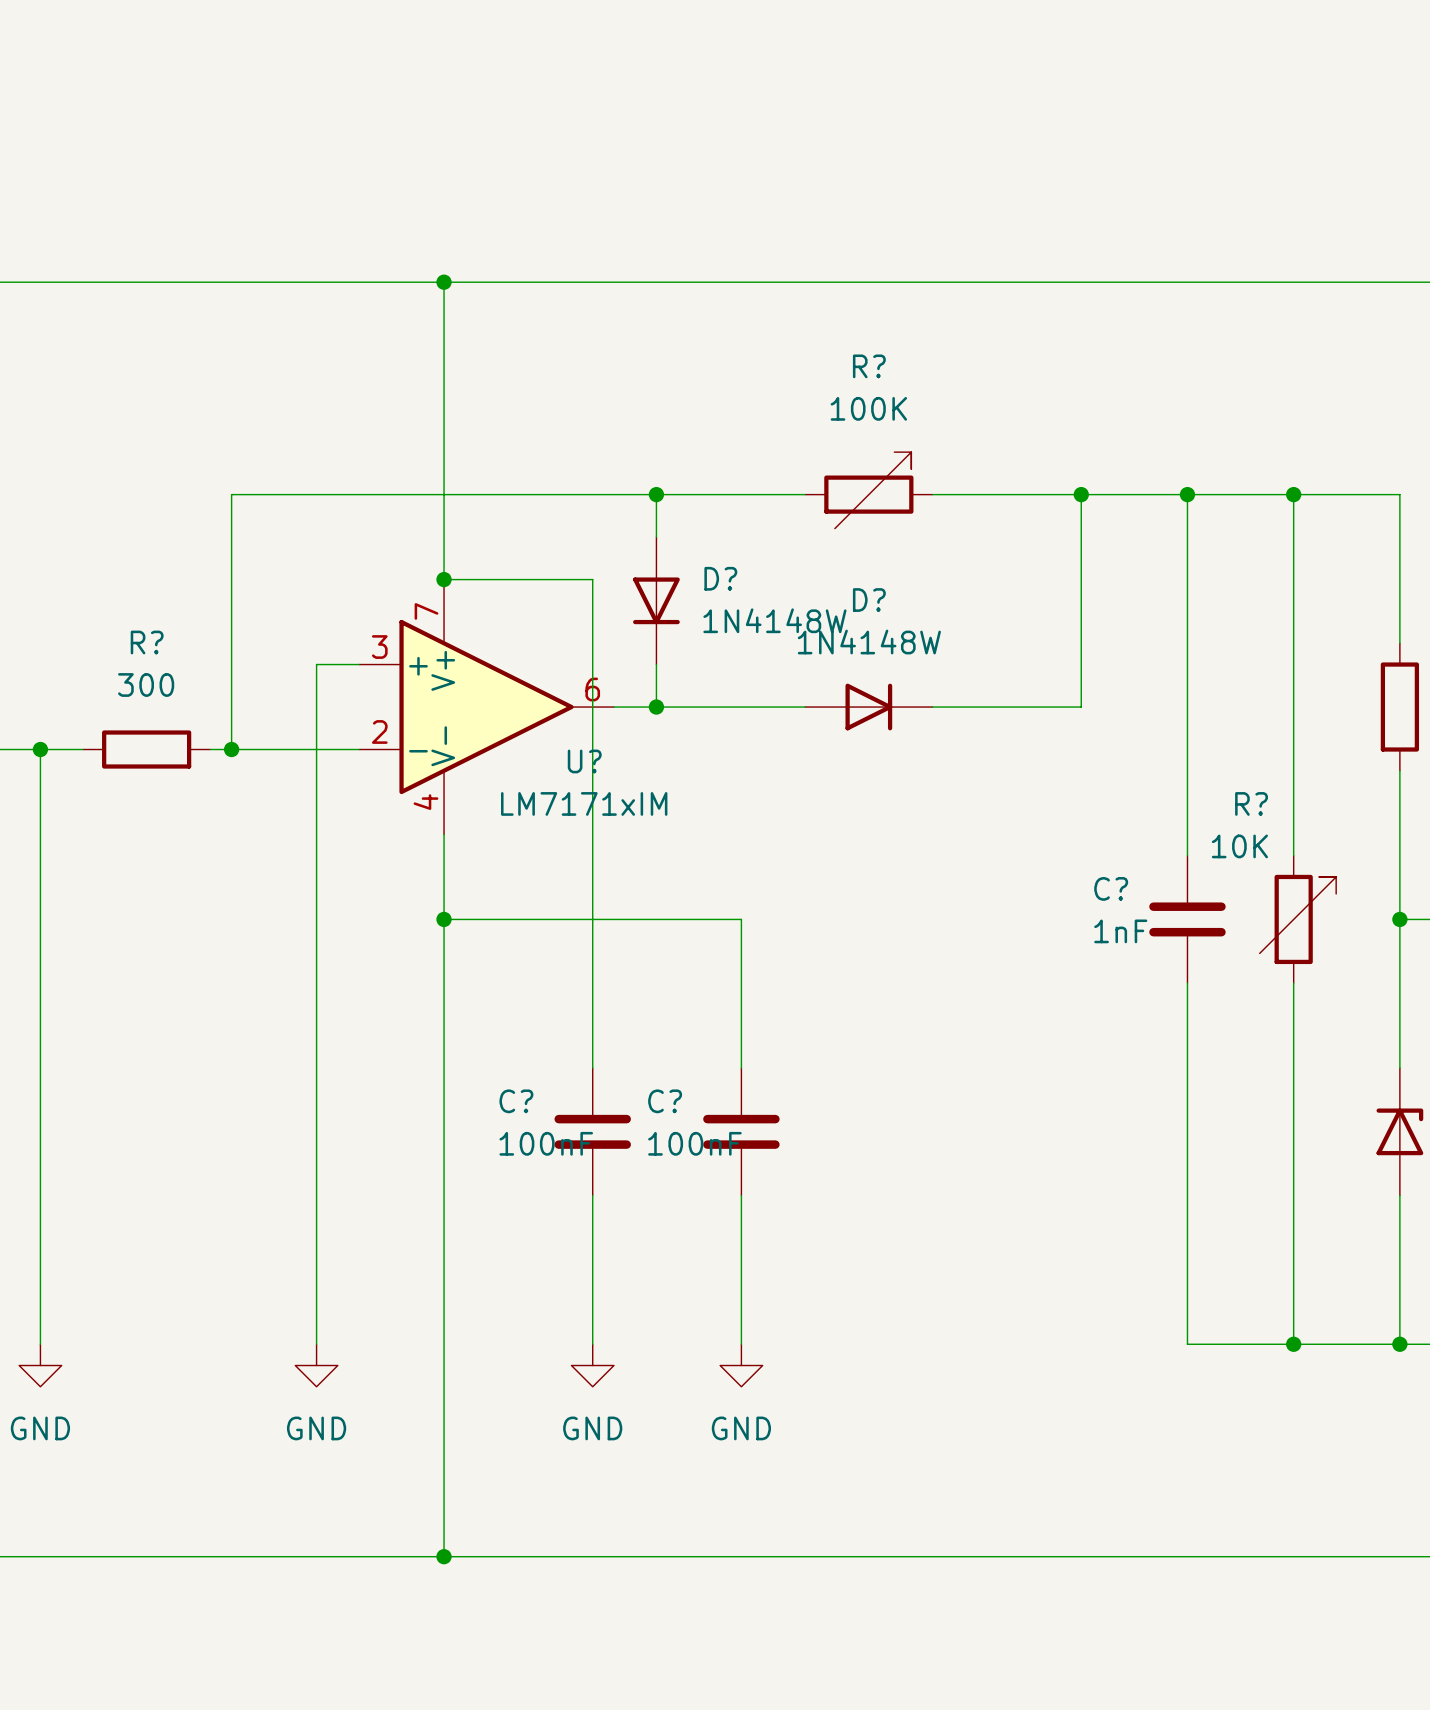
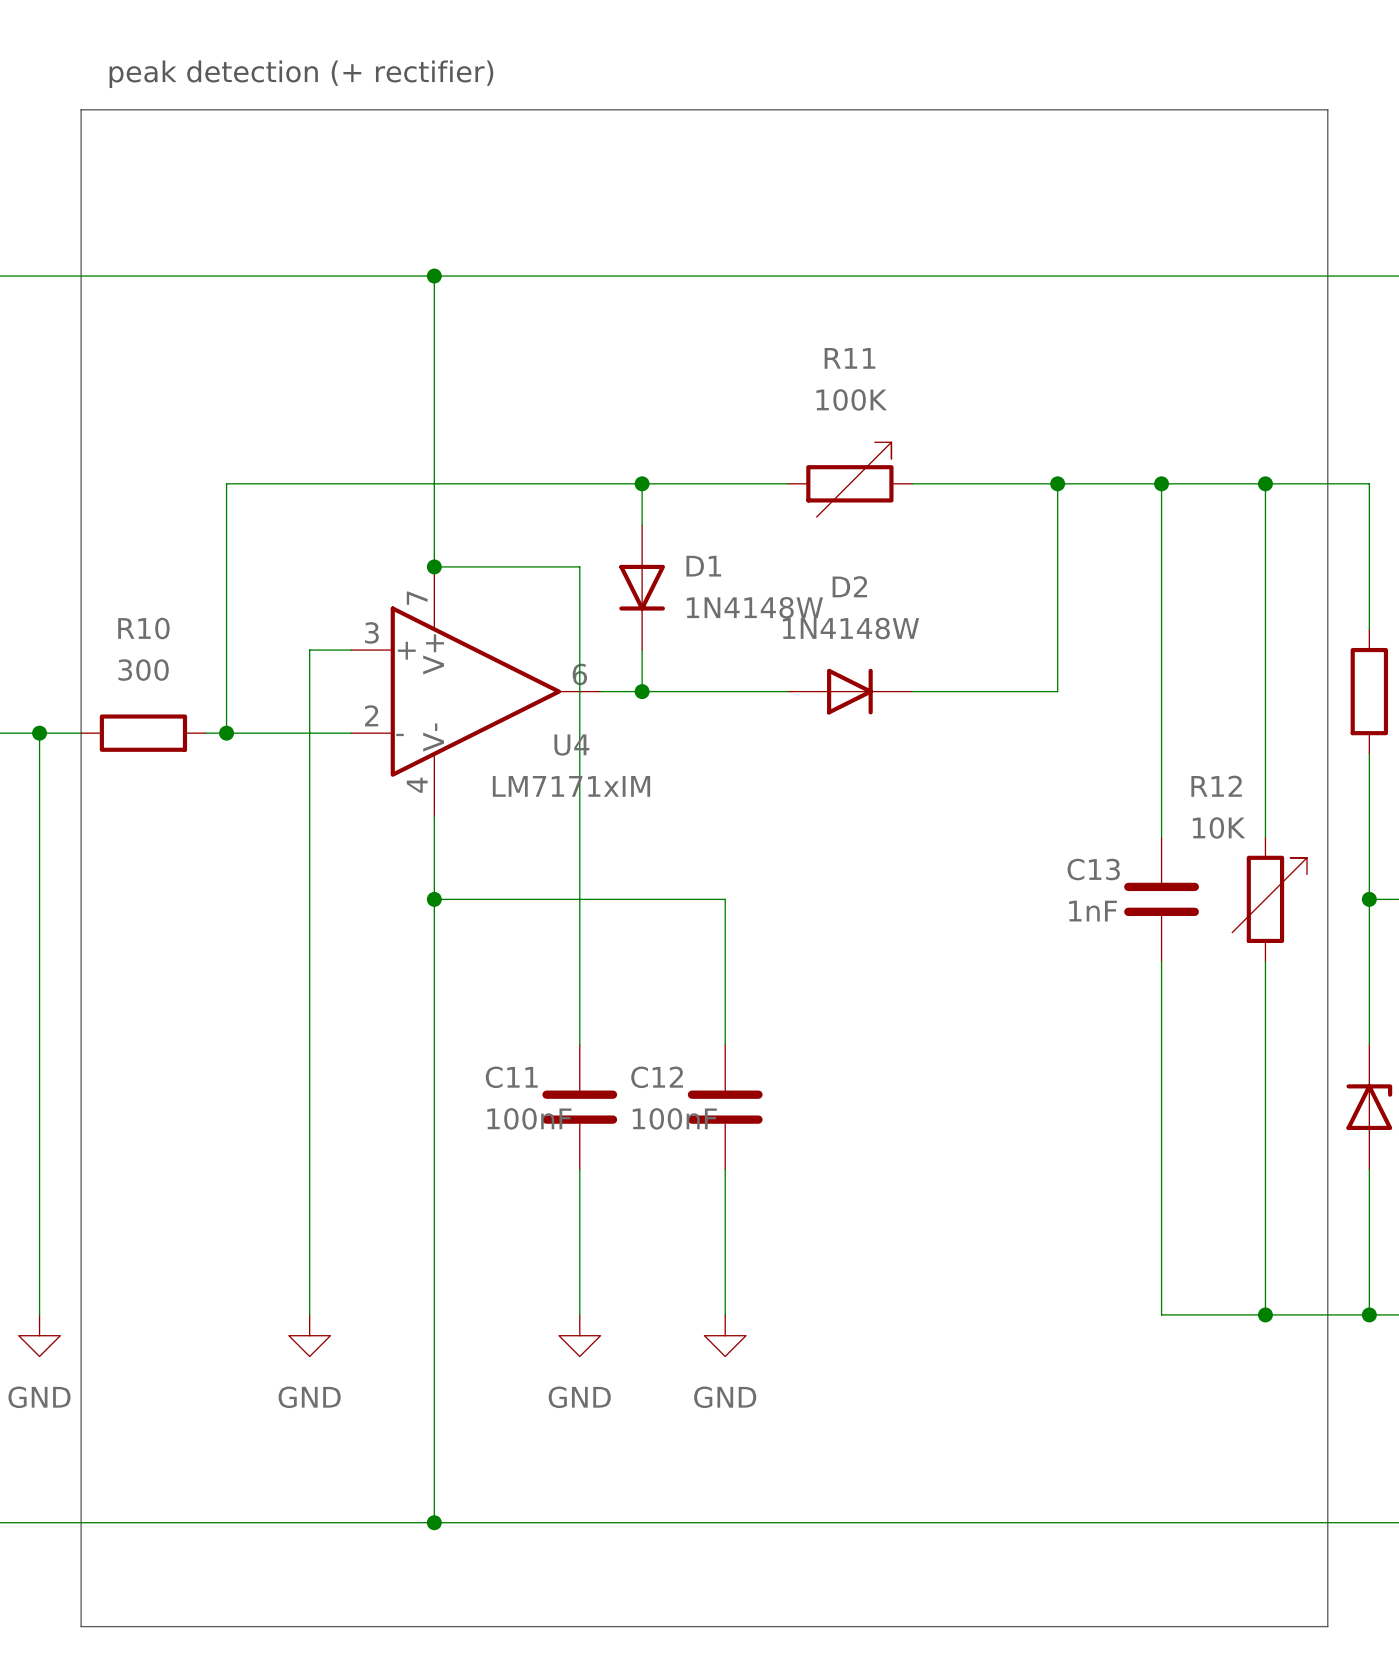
text: none -> peak detection (+ rectifier) (301, 74)
line: none -> (81, 109) (1327, 109) (1327, 1626) (81, 1626) (81, 109)
R? name: R? (869, 366) -> R11 (849, 358)
D? name: D? (720, 578) -> D1 (703, 566)
D? name: D? (869, 600) -> D2 (849, 586)
R? name: R? (147, 642) -> R10 (143, 628)
U? name: U? (584, 761) -> U4 (571, 745)
R? name: R? (1251, 803) -> R12 (1216, 786)
C? name: C? (1111, 888) -> C13 (1093, 869)
C? name: C? (516, 1101) -> C11 (511, 1077)
C? name: C? (665, 1101) -> C12 (657, 1077)

